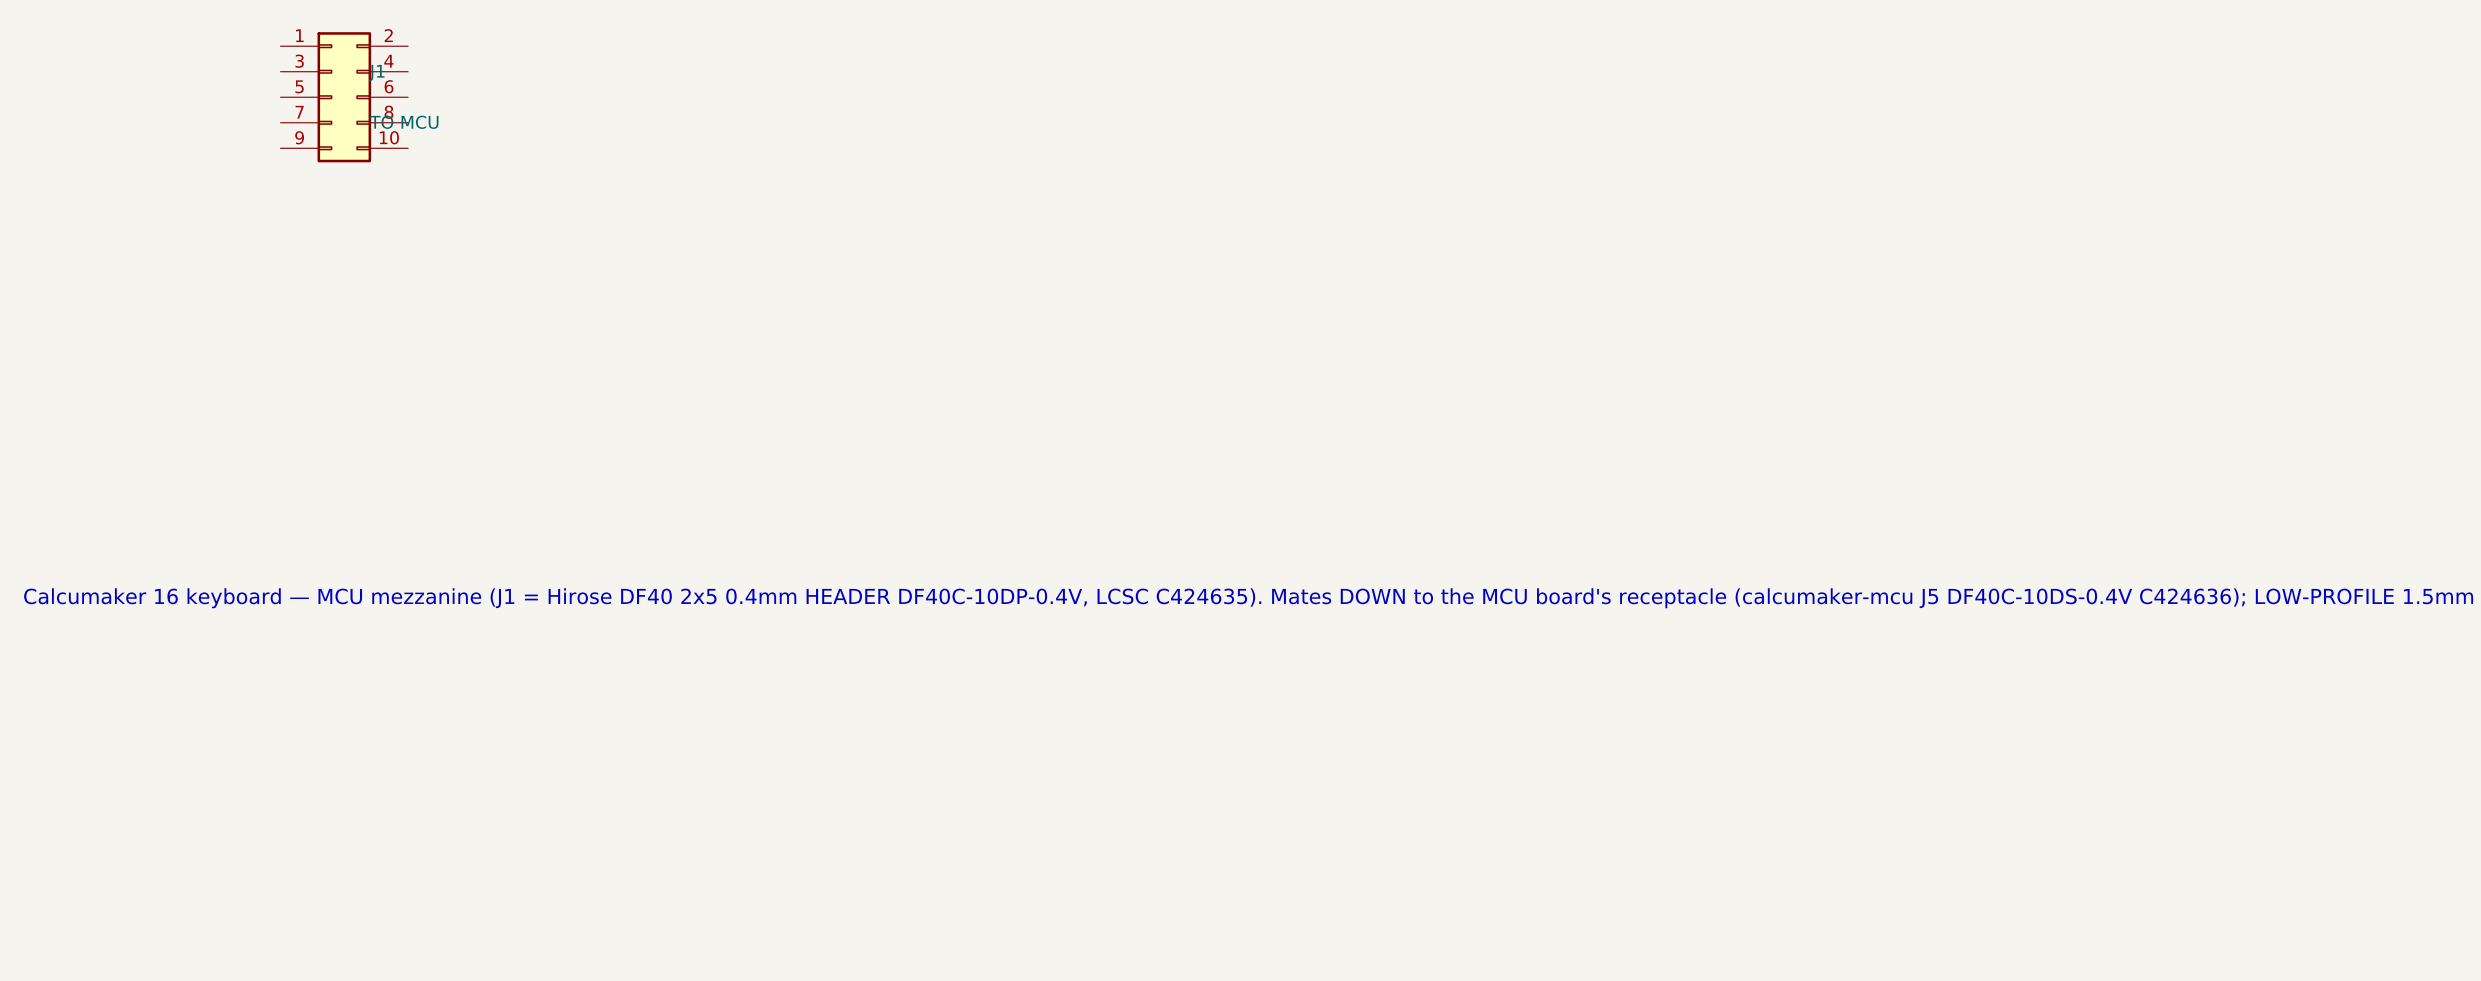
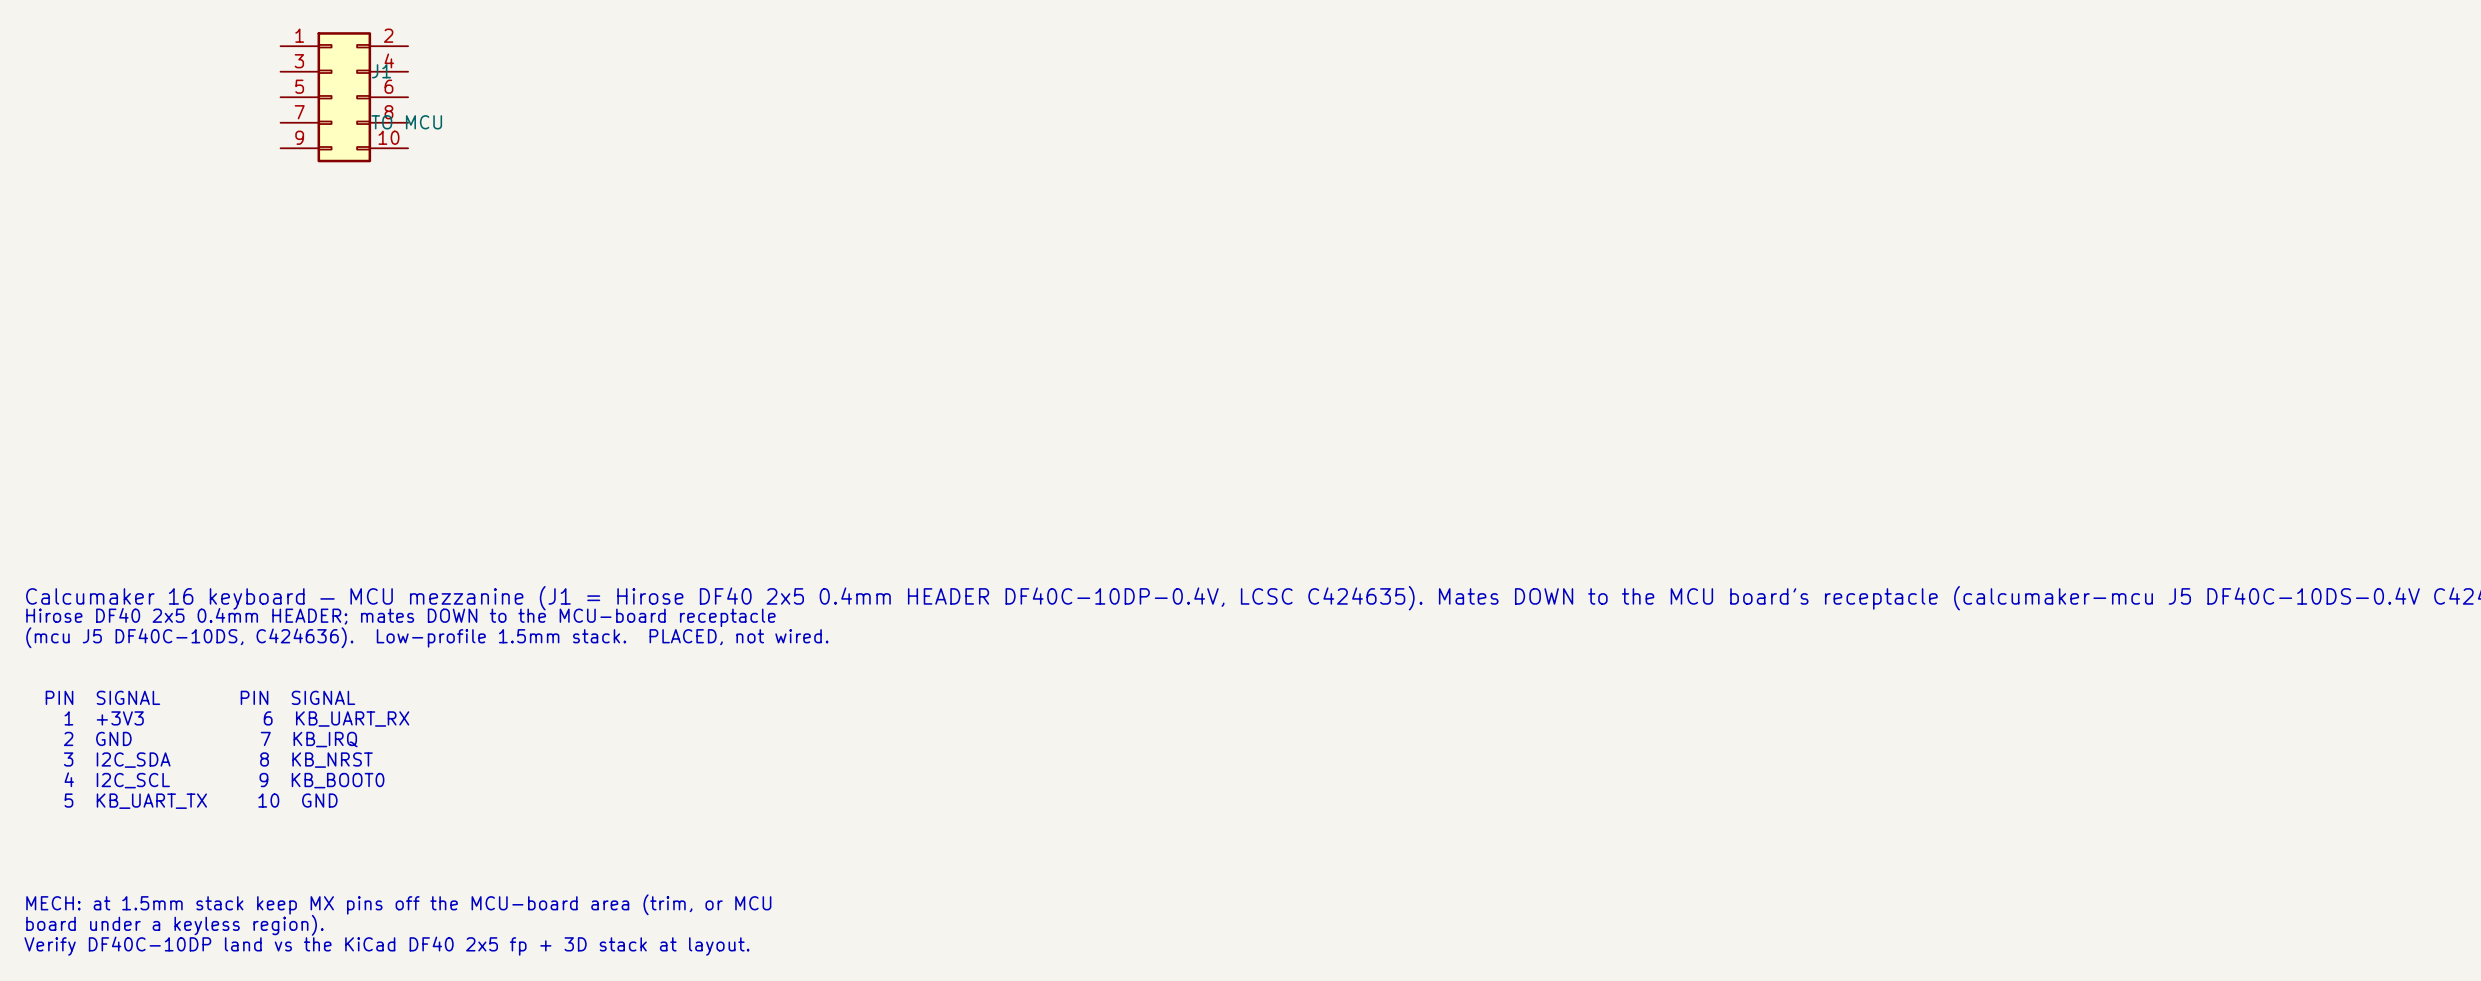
text: none -> Hirose DF40 2x5 0.4mm HEADER; mates DOWN to the MCU-board receptacle (400, 617)
text: none -> (mcu J5 DF40C-10DS, C424636). Low-profile 1.5mm stack. PLACED, not wired. (427, 637)
text: none -> PIN SIGNAL PIN SIGNAL (200, 697)
text: none -> 1 +3V3 6 KB_UART_RX (236, 719)
text: none -> 2 GND 7 KB_IRQ (210, 739)
text: none -> 3 I2C_SDA 8 KB_NRST (218, 760)
text: none -> 4 I2C_SCL 9 KB_BOOT0 (224, 780)
text: none -> 5 KB_UART_TX 10 GND (201, 801)
text: none -> MECH: at 1.5mm stack keep MX pins off the MCU-board area (trim, or MCU (398, 904)
text: none -> board under a keyless region). (174, 925)
text: none -> Verify DF40C-10DP land vs the KiCad DF40 2x5 fp + 3D stack at layout. (386, 946)

